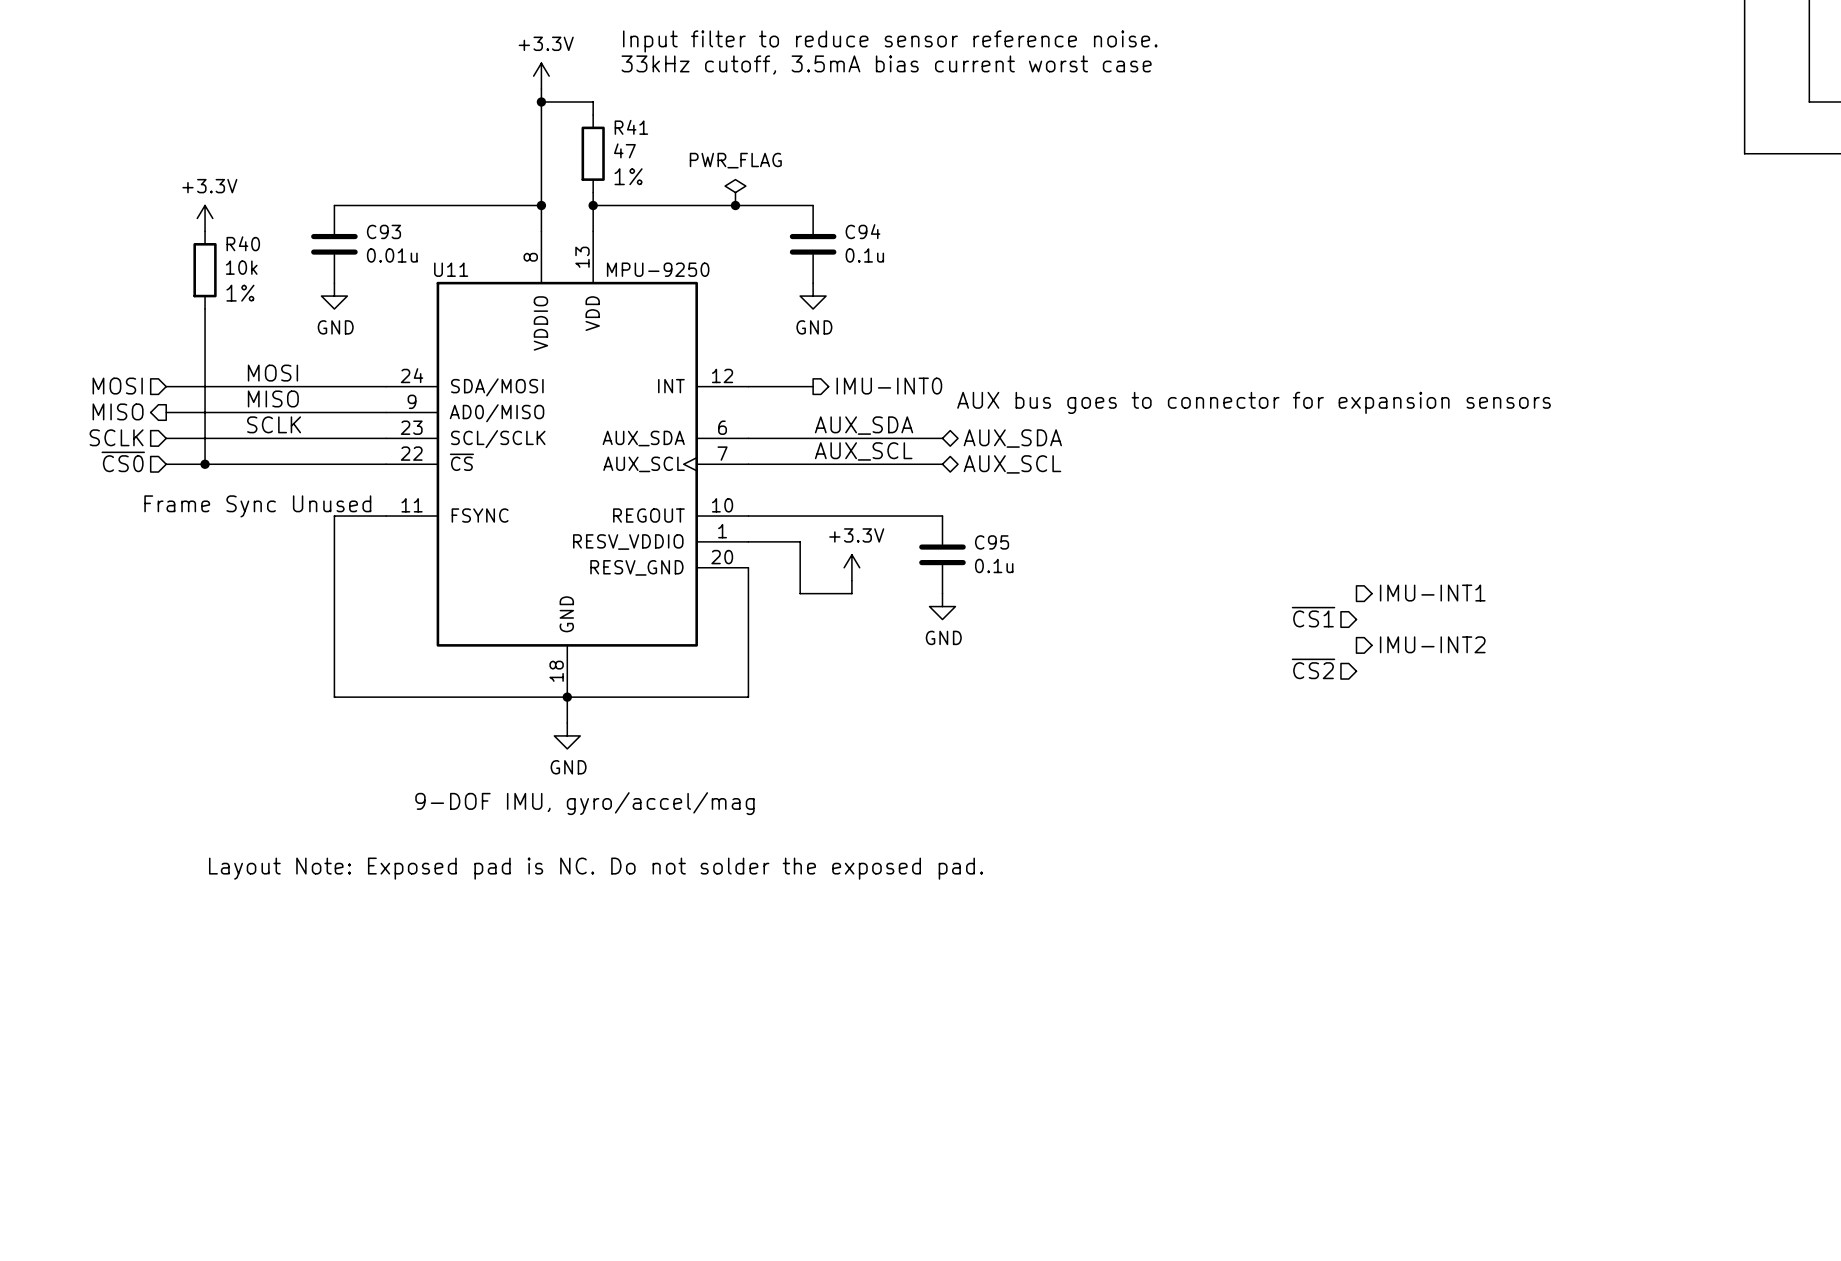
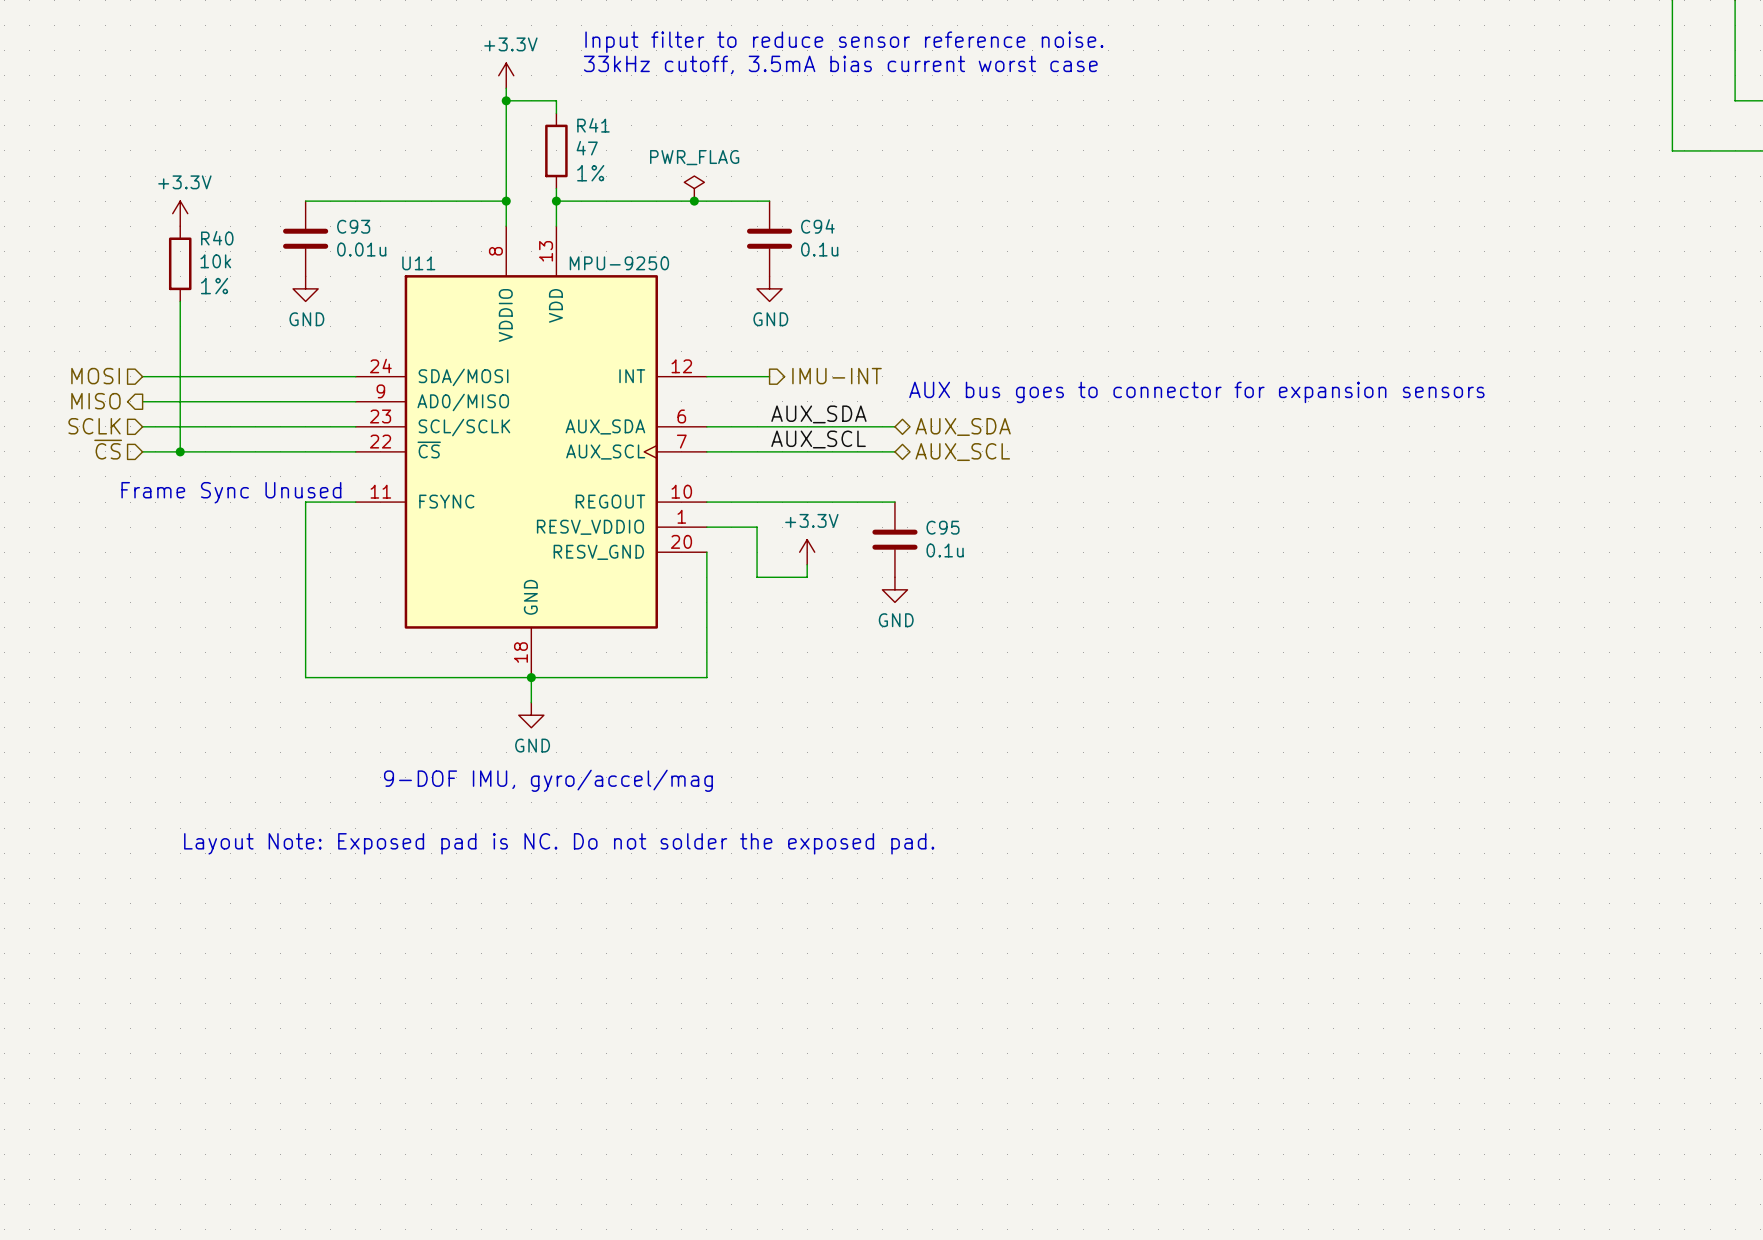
label: MOSI (272, 373) -> none
hierarchical label: IMU-INT0 (889, 386) -> IMU-INT (837, 376)
label: MISO (273, 398) -> none
label: SCLK (274, 424) -> none
hierarchical label: ~{CS0} (123, 461) -> ~{CS} (108, 449)
hierarchical label: IMU-INT1 (1432, 593) -> none
hierarchical label: ~{CS1} (1313, 617) -> none
hierarchical label: IMU-INT2 (1432, 644) -> none
hierarchical label: ~{CS2} (1313, 668) -> none

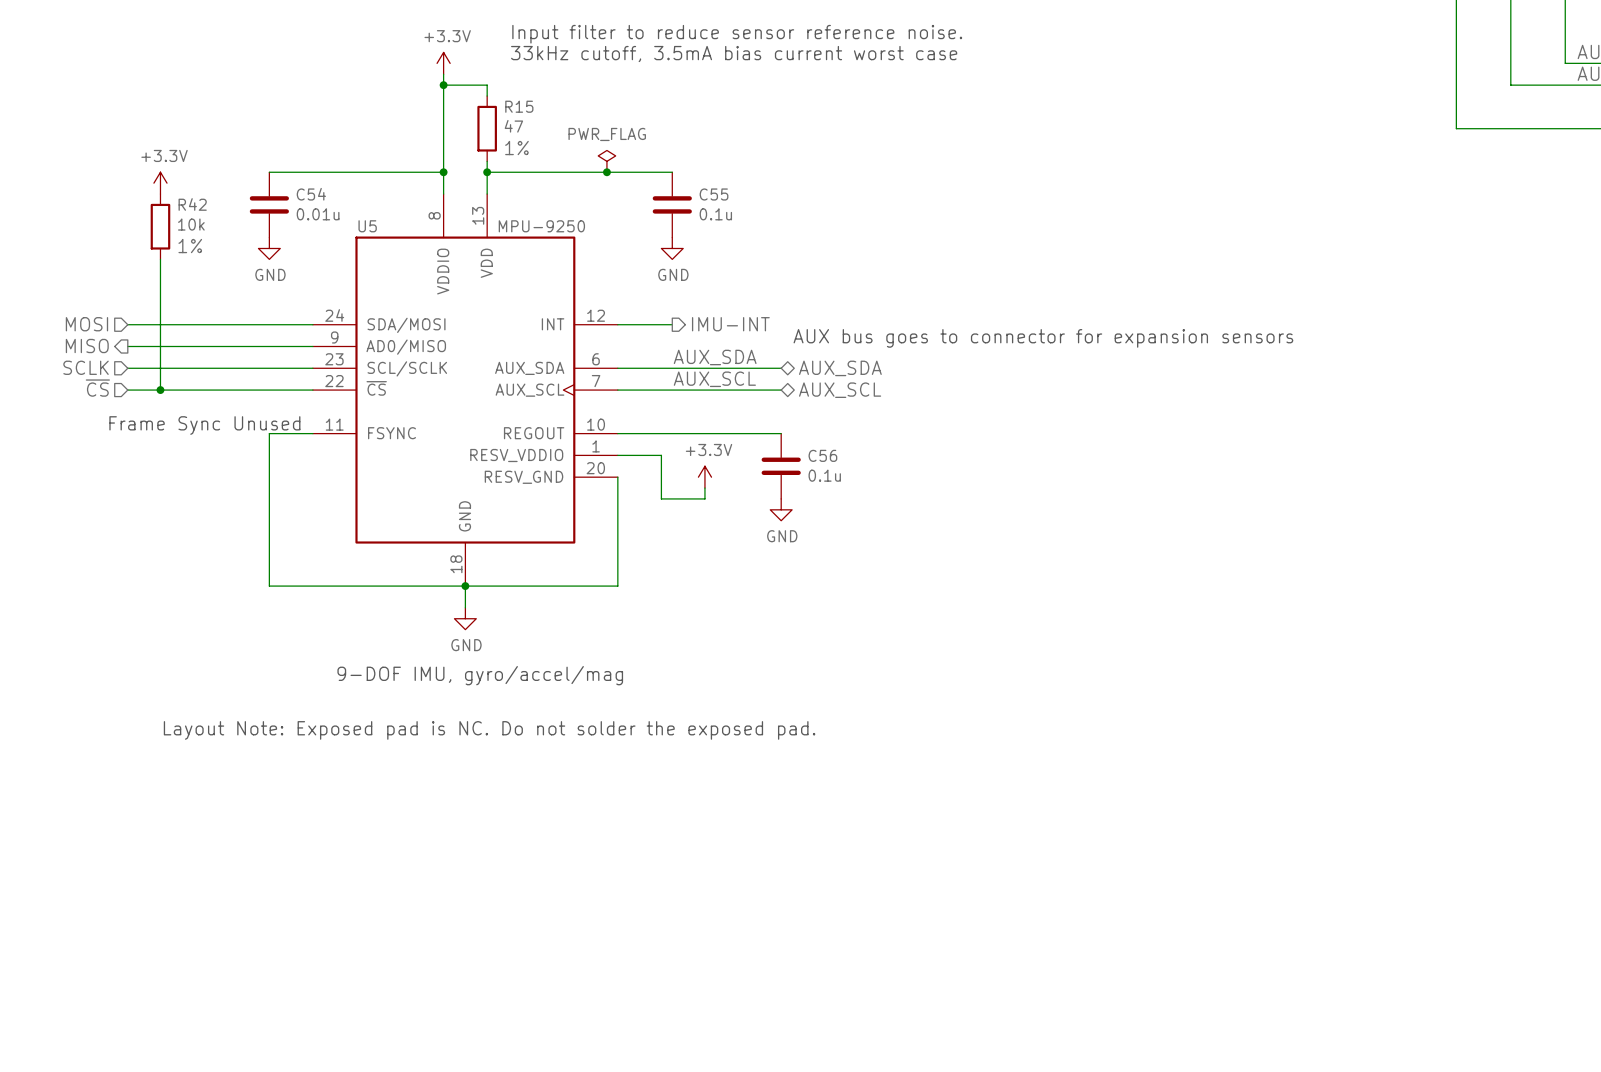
R41 name: R41 (593, 125) -> R15 (519, 106)
C93 name: C93 (353, 226) -> C54 (311, 194)
C94 name: C94 (817, 226) -> C55 (714, 194)
R40 name: R40 (217, 238) -> R42 (192, 204)
U11 name: U11 (418, 263) -> U5 (367, 226)
C95 name: C95 (943, 527) -> C56 (822, 455)

